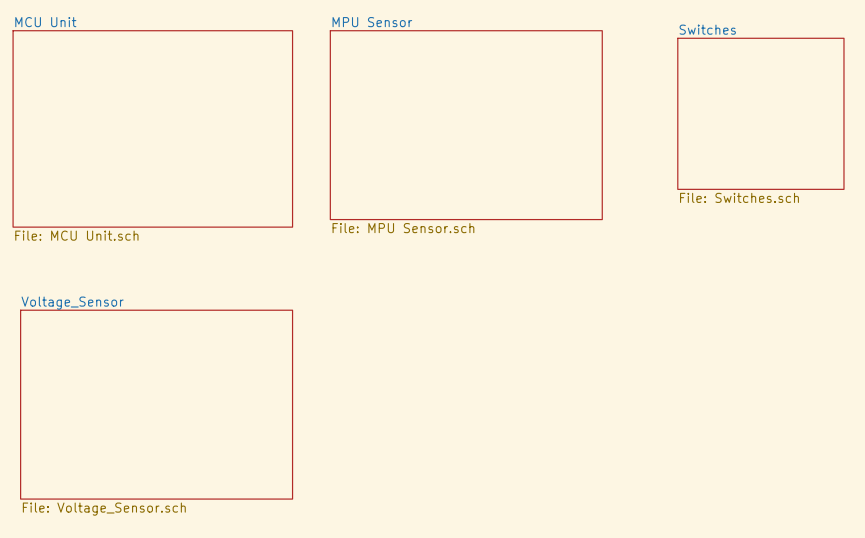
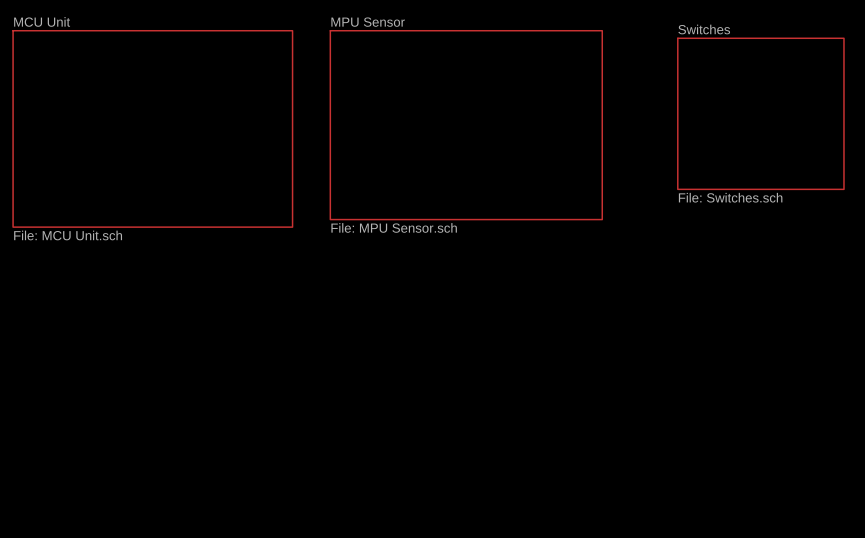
sheet Voltage_Sensor: File: Voltage_Sensor.sch (156, 404) -> none

